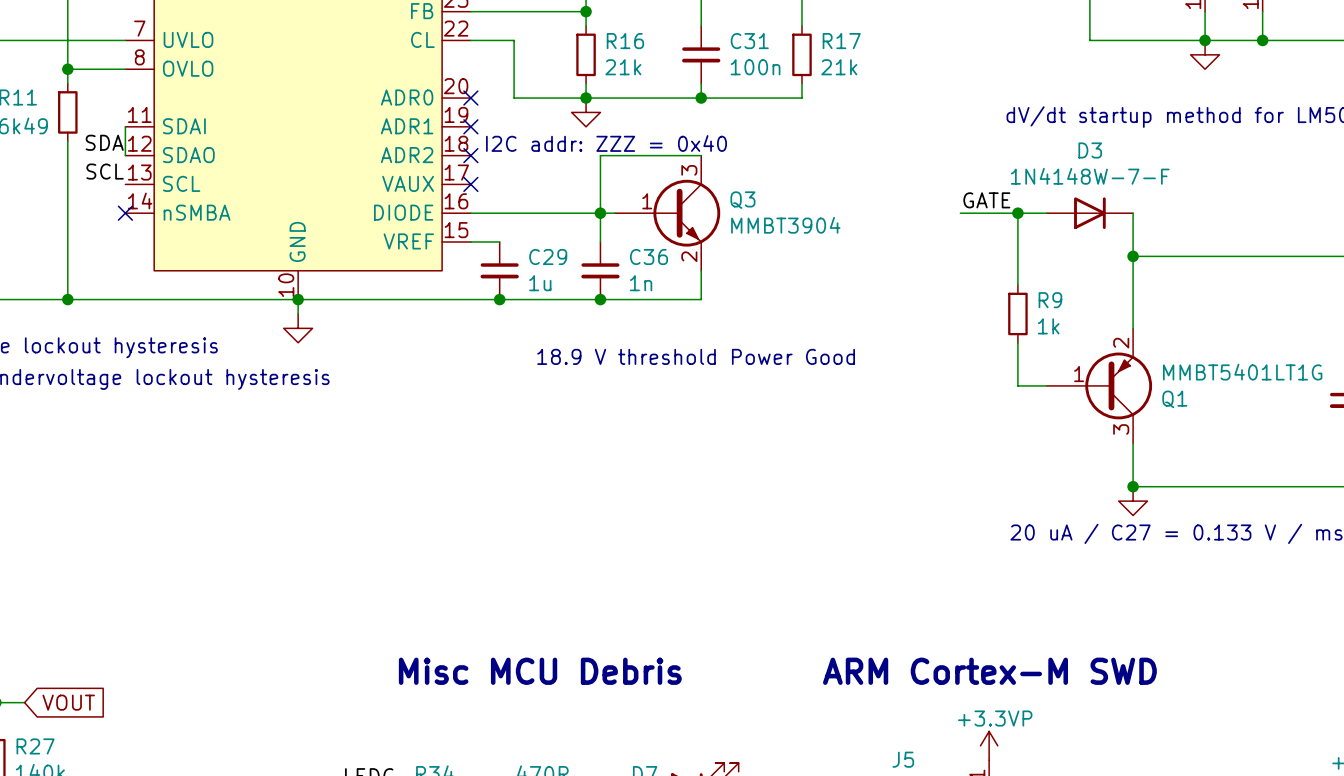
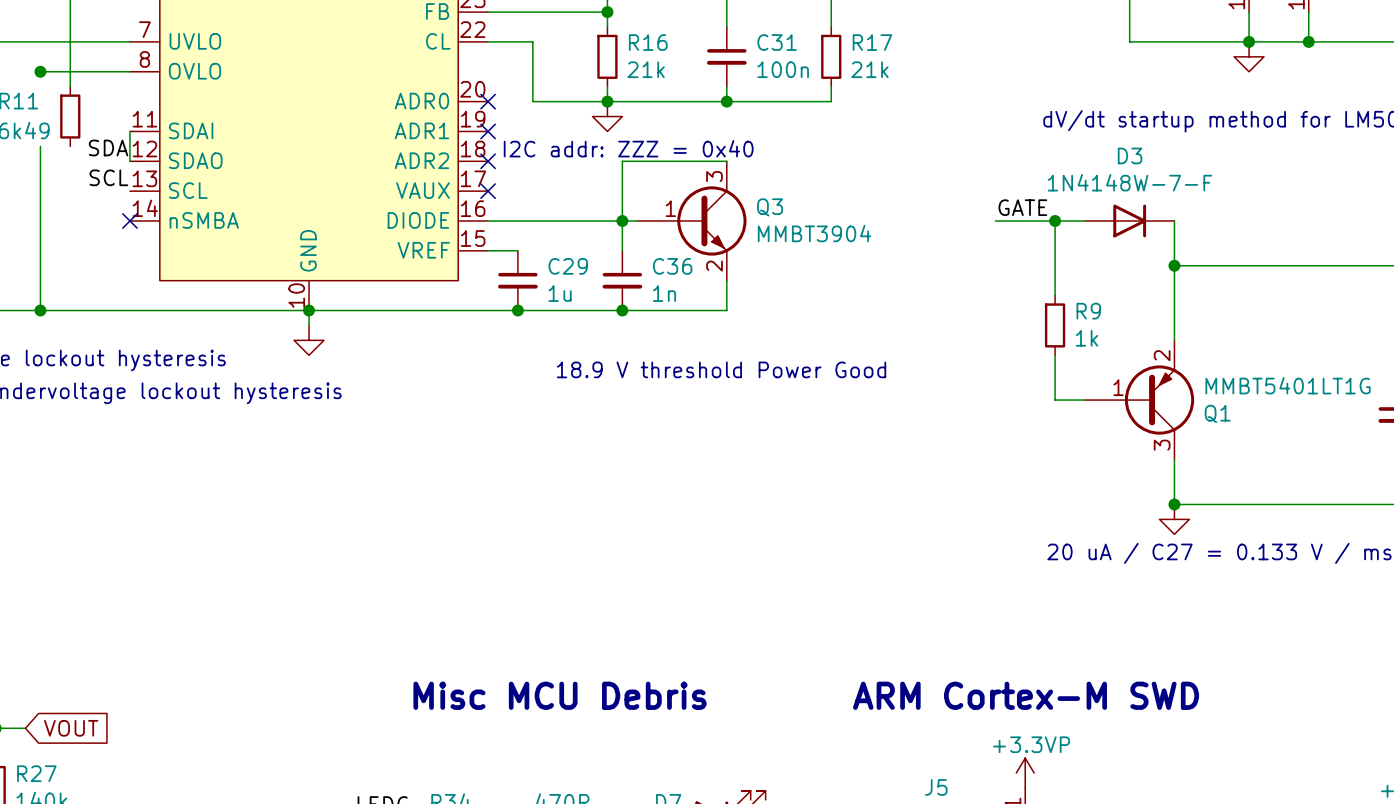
wire: none -> (40, 71) (70, 71)
junction position: (67, 69) -> (40, 71)
wire: (67, 141) (67, 299) -> (40, 146) (40, 310)
junction position: (67, 299) -> (40, 310)

